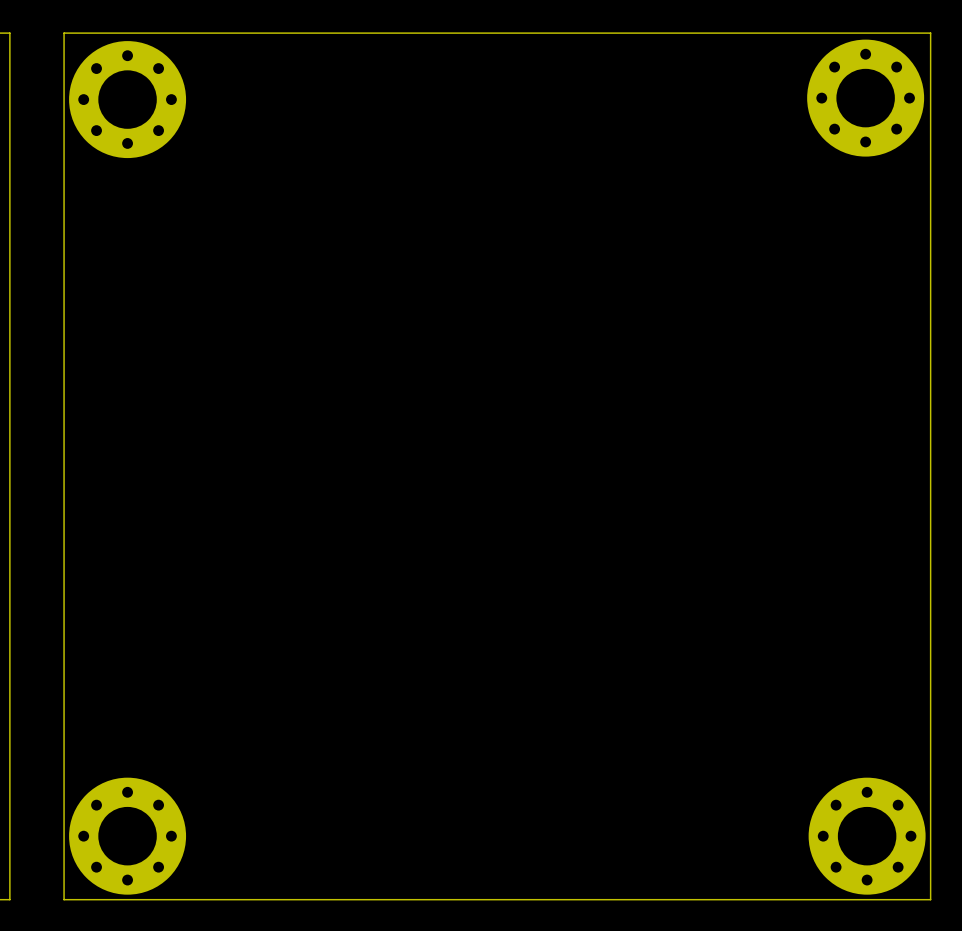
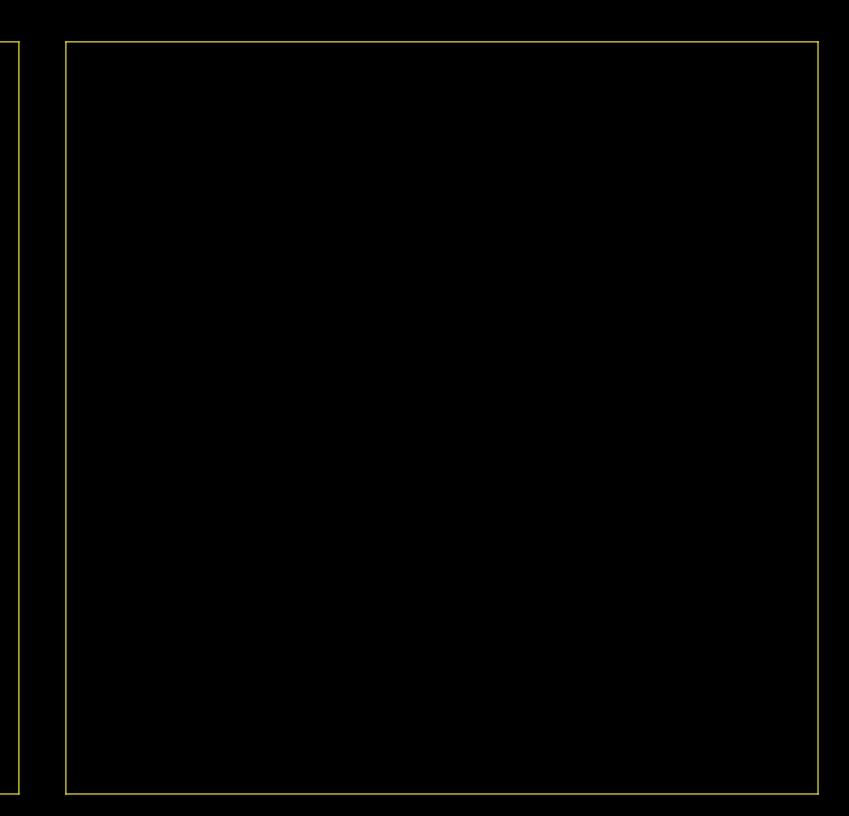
part: (865, 98) -> none
part: (127, 99) -> none
part: (127, 836) -> none
part: (867, 836) -> none

